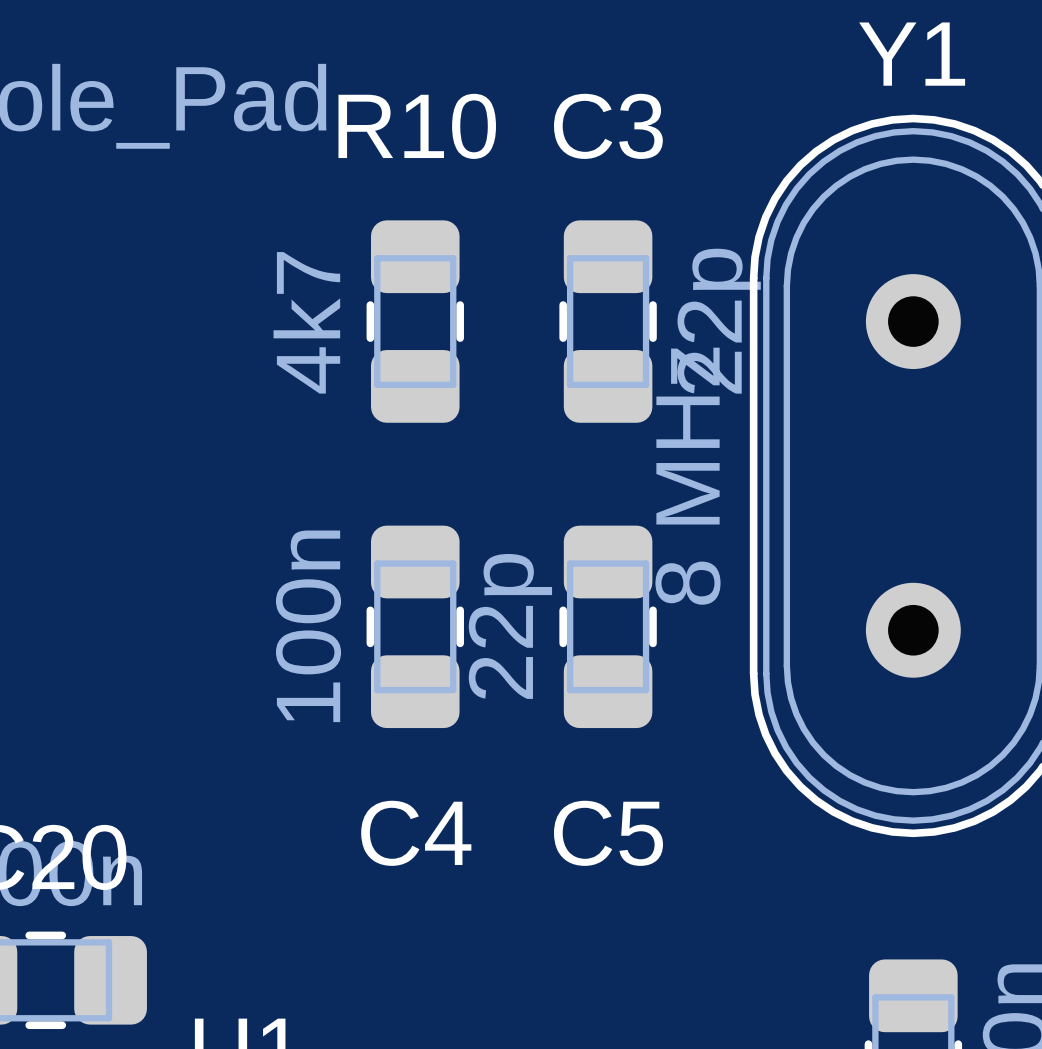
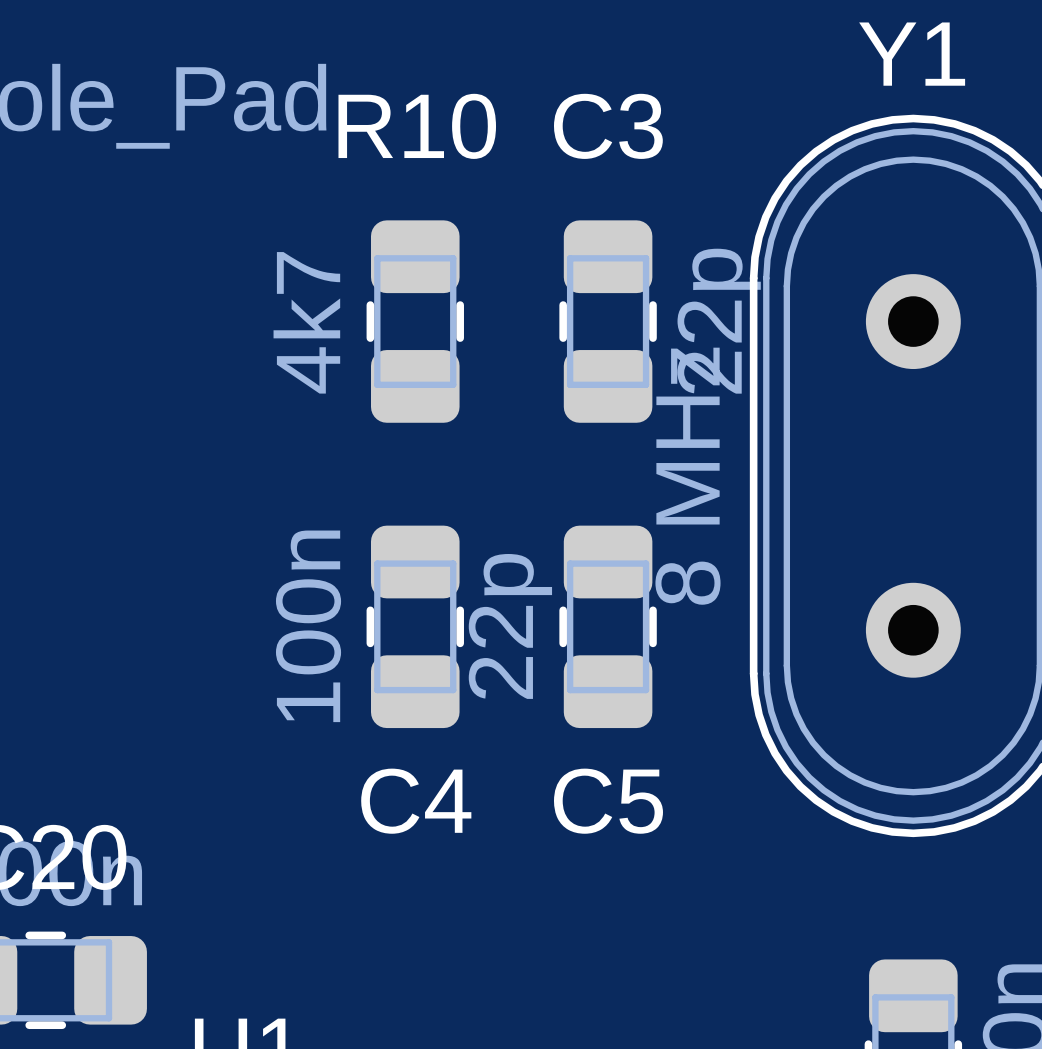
C4 name position: C4 (416, 833) -> C4 (416, 801)
C5 name position: C5 (608, 833) -> C5 (608, 801)

